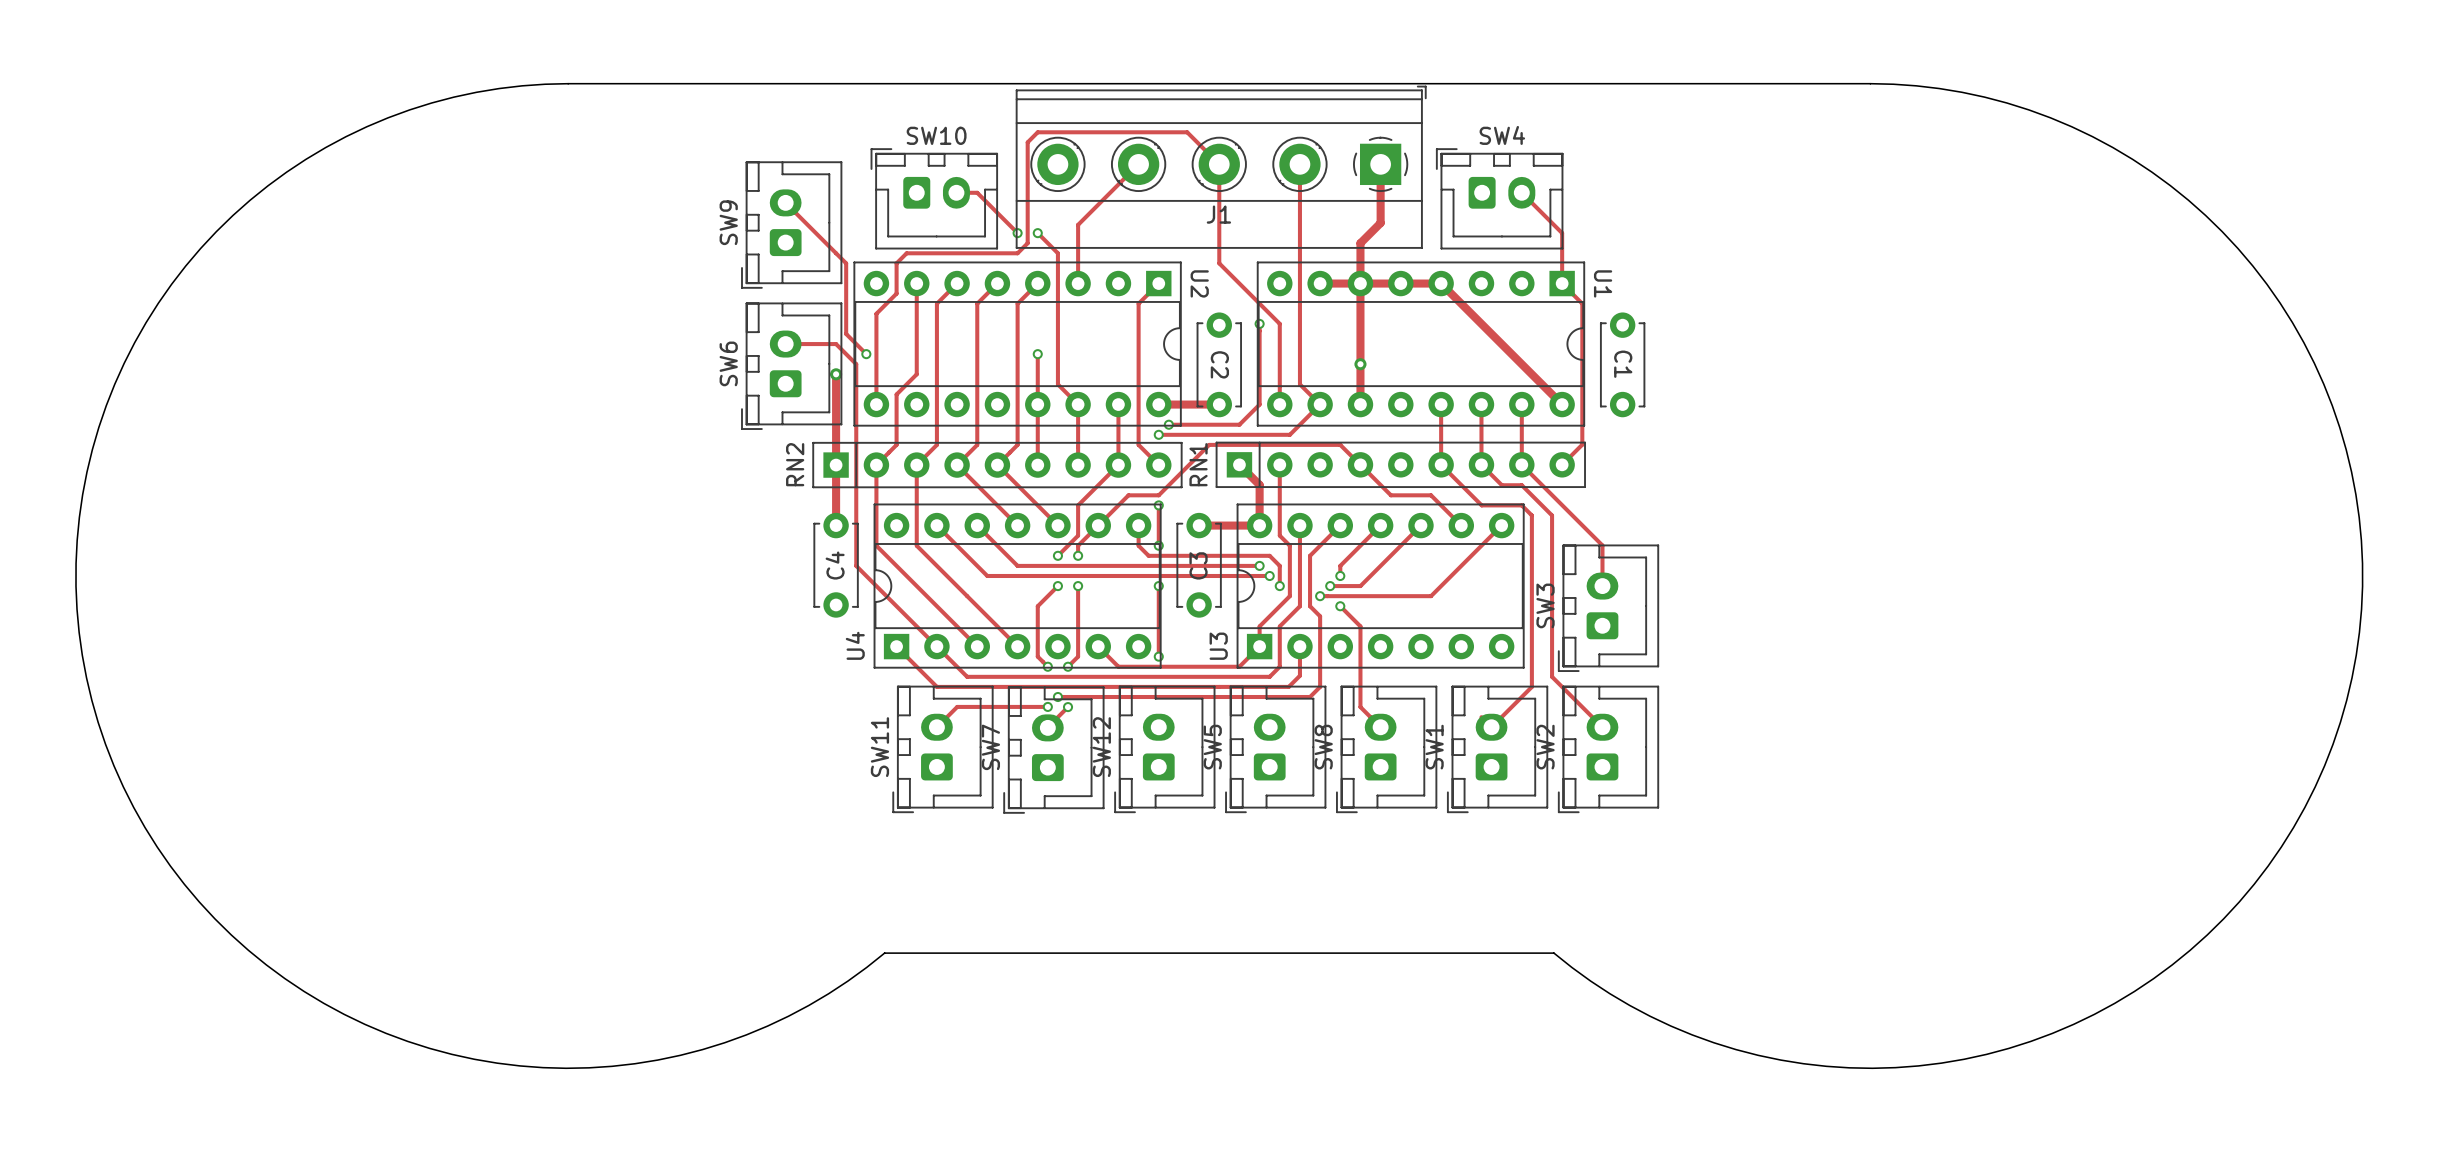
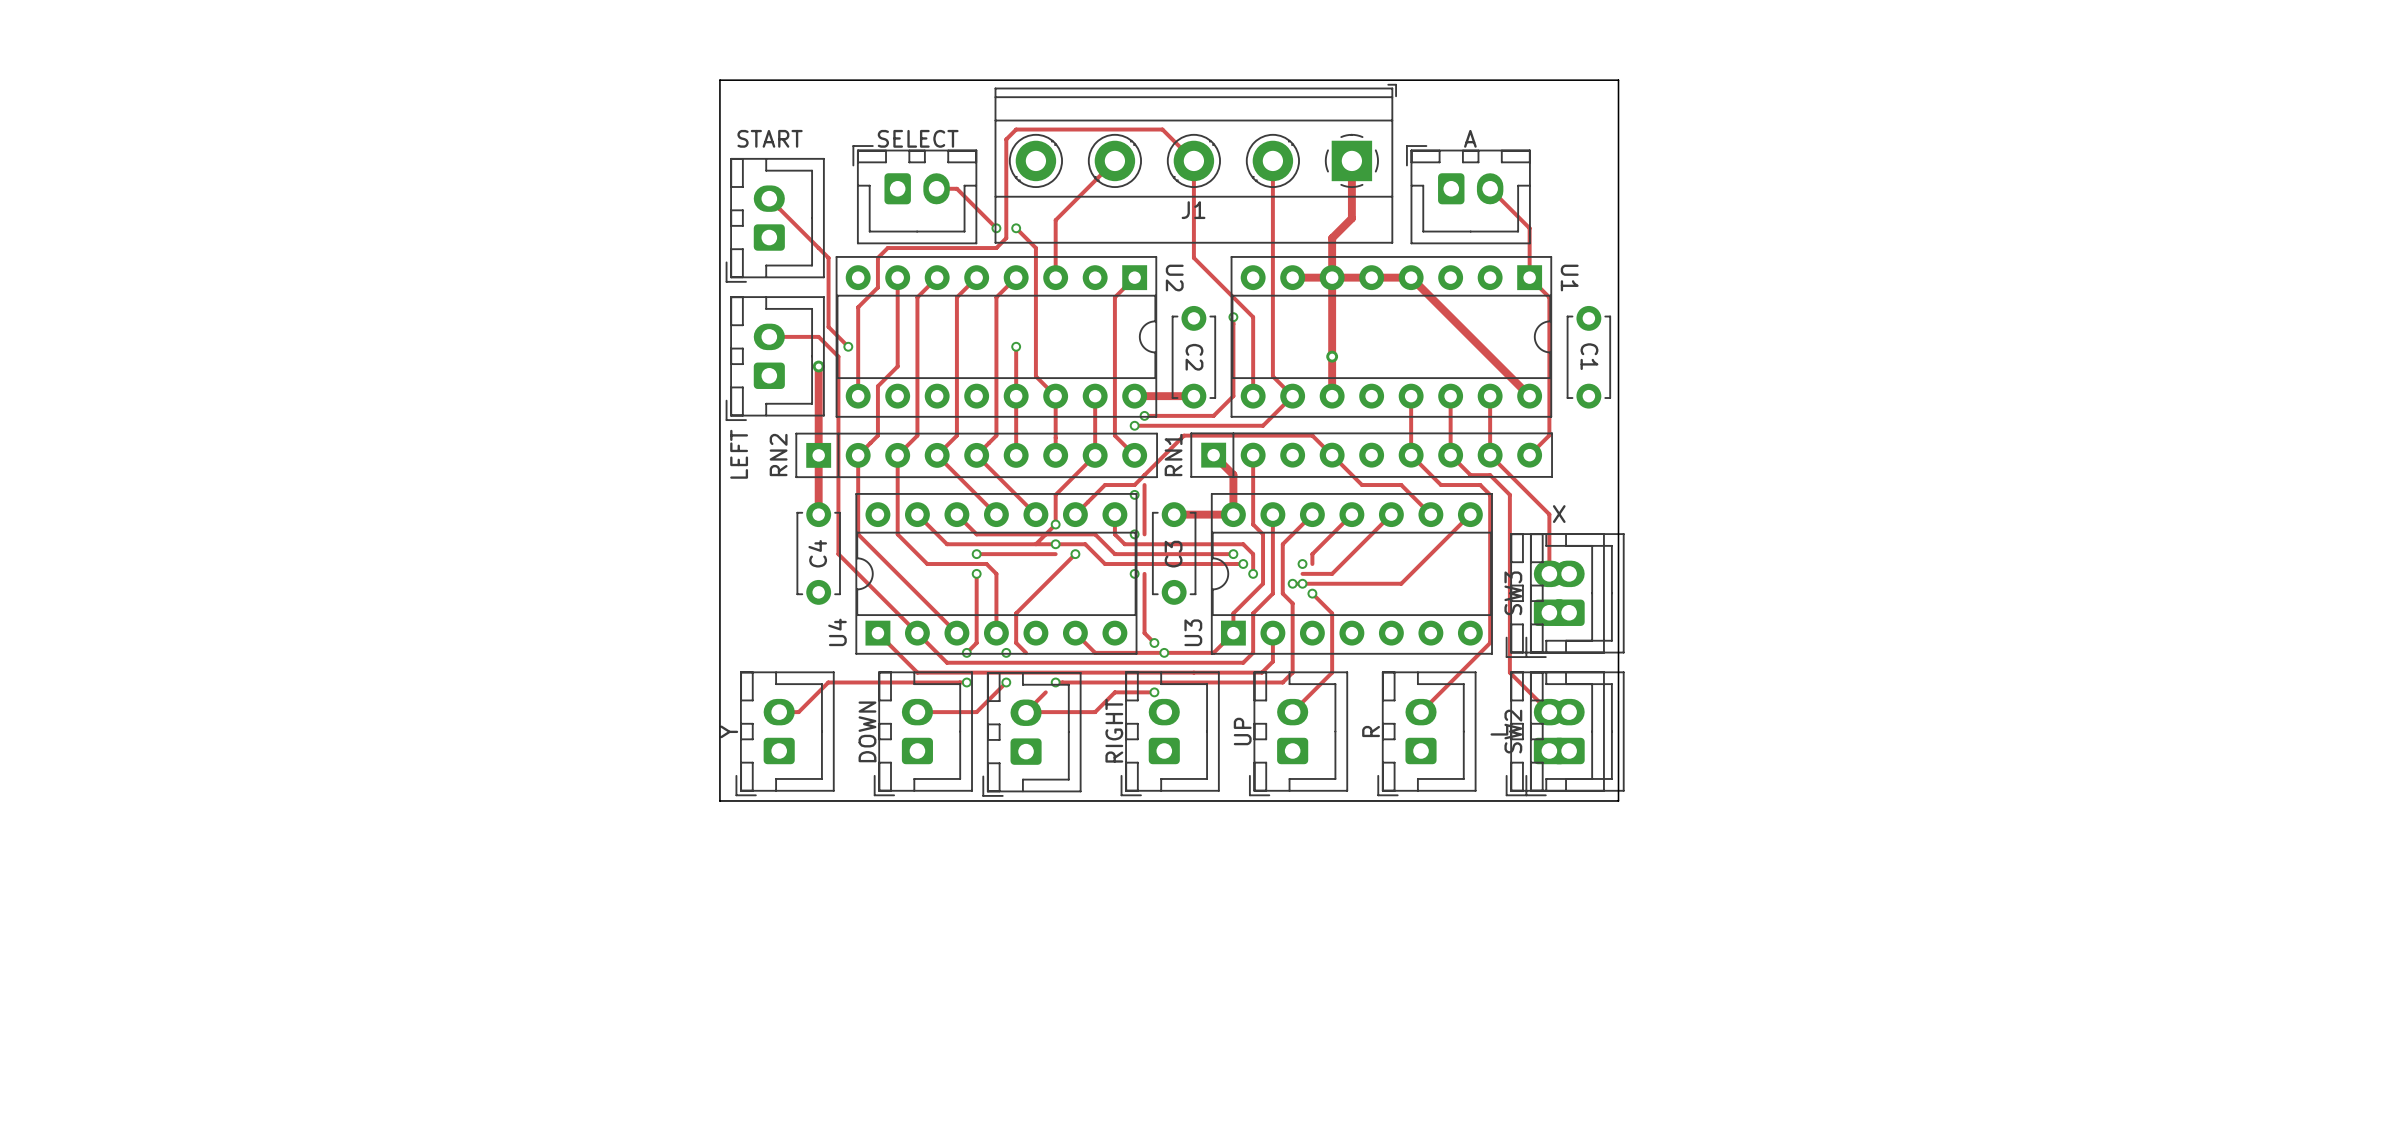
board edge: none -> (719, 80) (719, 800) (1618, 800) (1618, 80) (719, 80)
board edge: (568, 83) (1870, 83) (1916, 85) (1962, 92) (2006, 102) (2050, 117) (2092, 136) (2132, 159) (2170, 185) (2205, 215) (2237, 248) (2266, 284) (2292, 322) (2314, 363) (2332, 405) (2346, 449) (2355, 494) (2361, 540) (2362, 586) (2356, 655) (2346, 700) (2332, 744) (2304, 807) (2268, 866) (2223, 918) (2172, 964) (2114, 1003) (2073, 1024) (2008, 1048) (1941, 1063) (1895, 1067) (1849, 1067) (1803, 1063) (1735, 1049) (1692, 1034) (1629, 1005) (1590, 981) (1553, 953) (884, 953) (847, 981) (808, 1005) (746, 1034) (680, 1055) (612, 1066) (566, 1068) (497, 1063) (429, 1048) (386, 1033) (344, 1014) (304, 991) (266, 964) (231, 935) (199, 901) (170, 866) (133, 807) (105, 744) (91, 700) (82, 655) (77, 609) (76, 563) (82, 494) (92, 449) (106, 405) (124, 363) (146, 322) (171, 284) (200, 248) (250, 200) (286, 172) (325, 147) (366, 126) (409, 109) (453, 97) (499, 88) (568, 83) -> none
SW10 name: SW10 (936, 135) -> none
SW4 name: SW4 (1502, 135) -> none
SW9 value: none -> START (770, 138)
SW10 value: none -> SELECT (918, 138)
SW4 value: none -> A (1470, 138)
SW9 name: SW9 (728, 222) -> none
SW6 name: SW6 (728, 363) -> none
SW6 value: none -> LEFT (739, 454)
track: none -> (1144, 485) (1144, 534)
track: (1471, 495) (1481, 505) (1521, 505) (1531, 515) (1531, 686) (1491, 727) (1481, 717) -> (1441, 485) (1480, 485) (1490, 494) (1490, 643) (1421, 712)
track: (1158, 505) (1158, 545) -> none
track: (1541, 505) (1552, 515) (1552, 676) (1602, 727) -> (1509, 494) (1509, 672) (1549, 712)
track: (1098, 525) (1078, 545) (1078, 555) -> none
track: (1582, 525) (1602, 545) (1602, 586) -> (1549, 514) (1549, 573)
via: none -> (1055, 524)
track: (997, 545) (1017, 565) -> (976, 554) (996, 554)
track: (967, 555) (987, 575) -> (927, 564) (966, 564)
via: (1057, 555) -> none
via: none -> (976, 554)
track: (1078, 565) (1138, 565) -> (976, 534) (1095, 534) (1114, 554)
via: none -> (1075, 554)
track: (947, 575) (1017, 646) -> (986, 564) (996, 573) (996, 633)
track: (1007, 575) (1128, 575) -> (947, 544) (1085, 544) (1105, 564)
via: none -> (1302, 564)
via: (1340, 575) -> none
via: none -> (976, 573)
track: (1057, 586) (1037, 606) (1037, 626) -> (1075, 554) (1016, 613)
via: (1057, 586) -> none
track: (1078, 586) (1078, 656) (1068, 666) -> (976, 573) (976, 643) (966, 652)
via: (1078, 586) -> none
track: (1158, 586) (1158, 656) -> none
track: none -> (1144, 573) (1144, 633) (1154, 643)
via: (1330, 586) -> none
via: none -> (1302, 583)
part: none -> X (1555, 595)
via: (1158, 656) -> none
via: none -> (1154, 643)
via: none -> (966, 652)
via: none -> (1006, 652)
via: (1047, 666) -> none
via: (1068, 666) -> none
via: none -> (1164, 652)
track: (1360, 686) (1360, 707) (1380, 727) -> (1332, 672) (1292, 712)
track: none -> (966, 682) (828, 682) (798, 712) (779, 712)
via: none -> (966, 682)
track: none -> (1006, 682) (976, 712) (907, 712)
via: none -> (1006, 682)
track: (1057, 697) (1078, 697) -> none
via: (1057, 697) -> none
via: none -> (1055, 682)
track: (1047, 706) (957, 706) (936, 727) -> none
via: (1047, 706) -> none
via: (1068, 707) -> none
track: none -> (1154, 692) (1114, 692) (1095, 712) (1035, 712)
via: none -> (1154, 692)
SW11 name: SW11 (879, 747) -> none
SW11 value: none -> DOWN (867, 731)
SW7 name: SW7 (990, 747) -> none
part: none -> Y (785, 733)
SW12: (1164, 749) -> none
part: none -> RIGHT (1170, 733)
SW5: (1275, 749) -> none
part: none -> UP (1298, 733)
SW8: (1386, 749) -> none
part: none -> R (1426, 733)
SW1: (1497, 749) -> none
part: none -> L (1555, 733)

